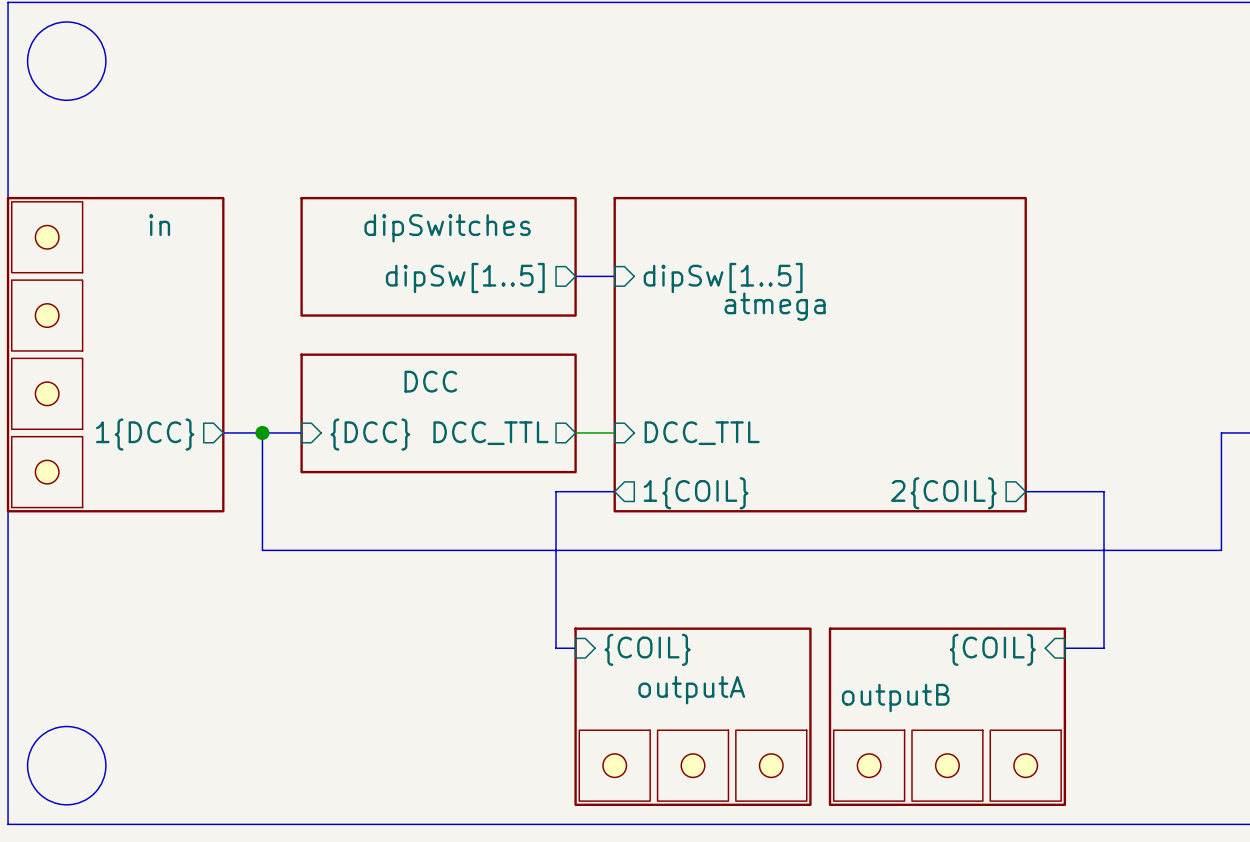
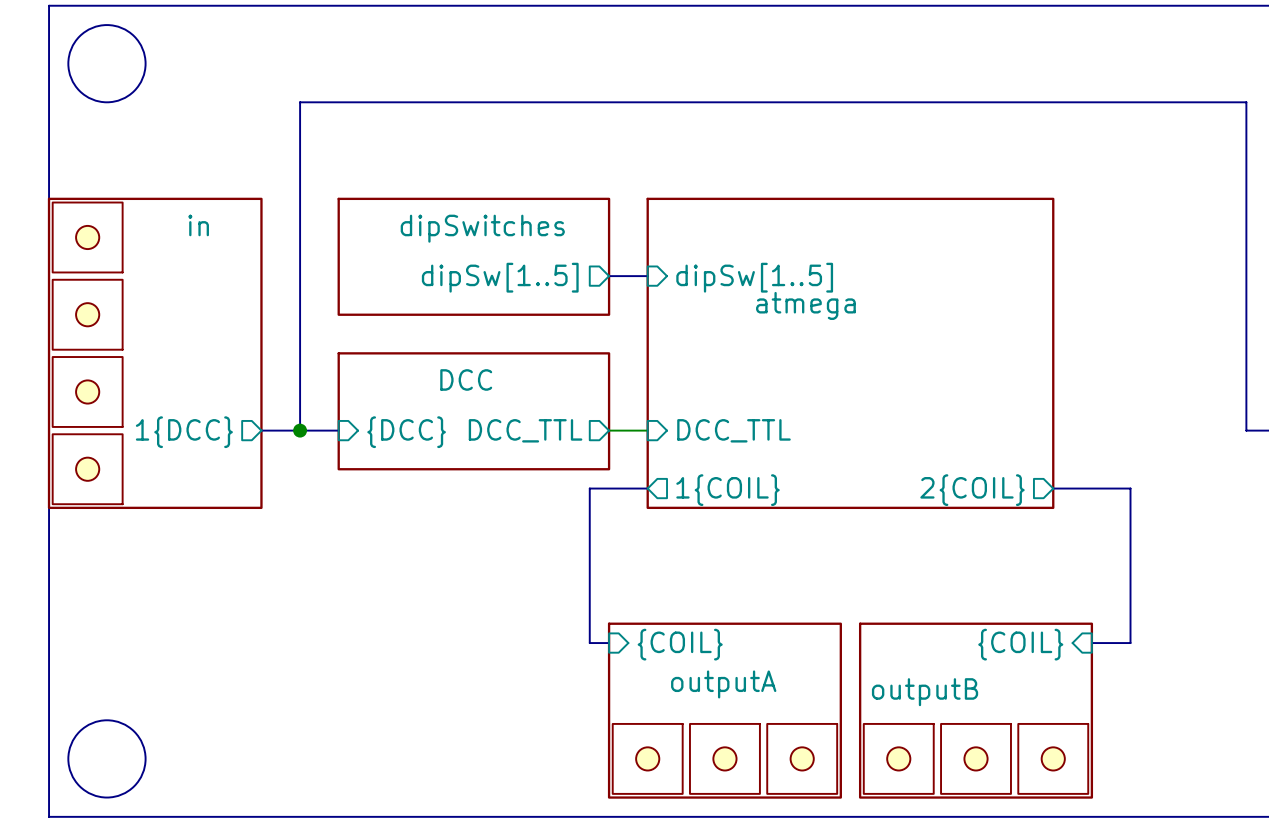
bus: (262, 432) (262, 550) (1221, 550) (1221, 432) -> (300, 430) (300, 102) (1246, 102) (1246, 430)

